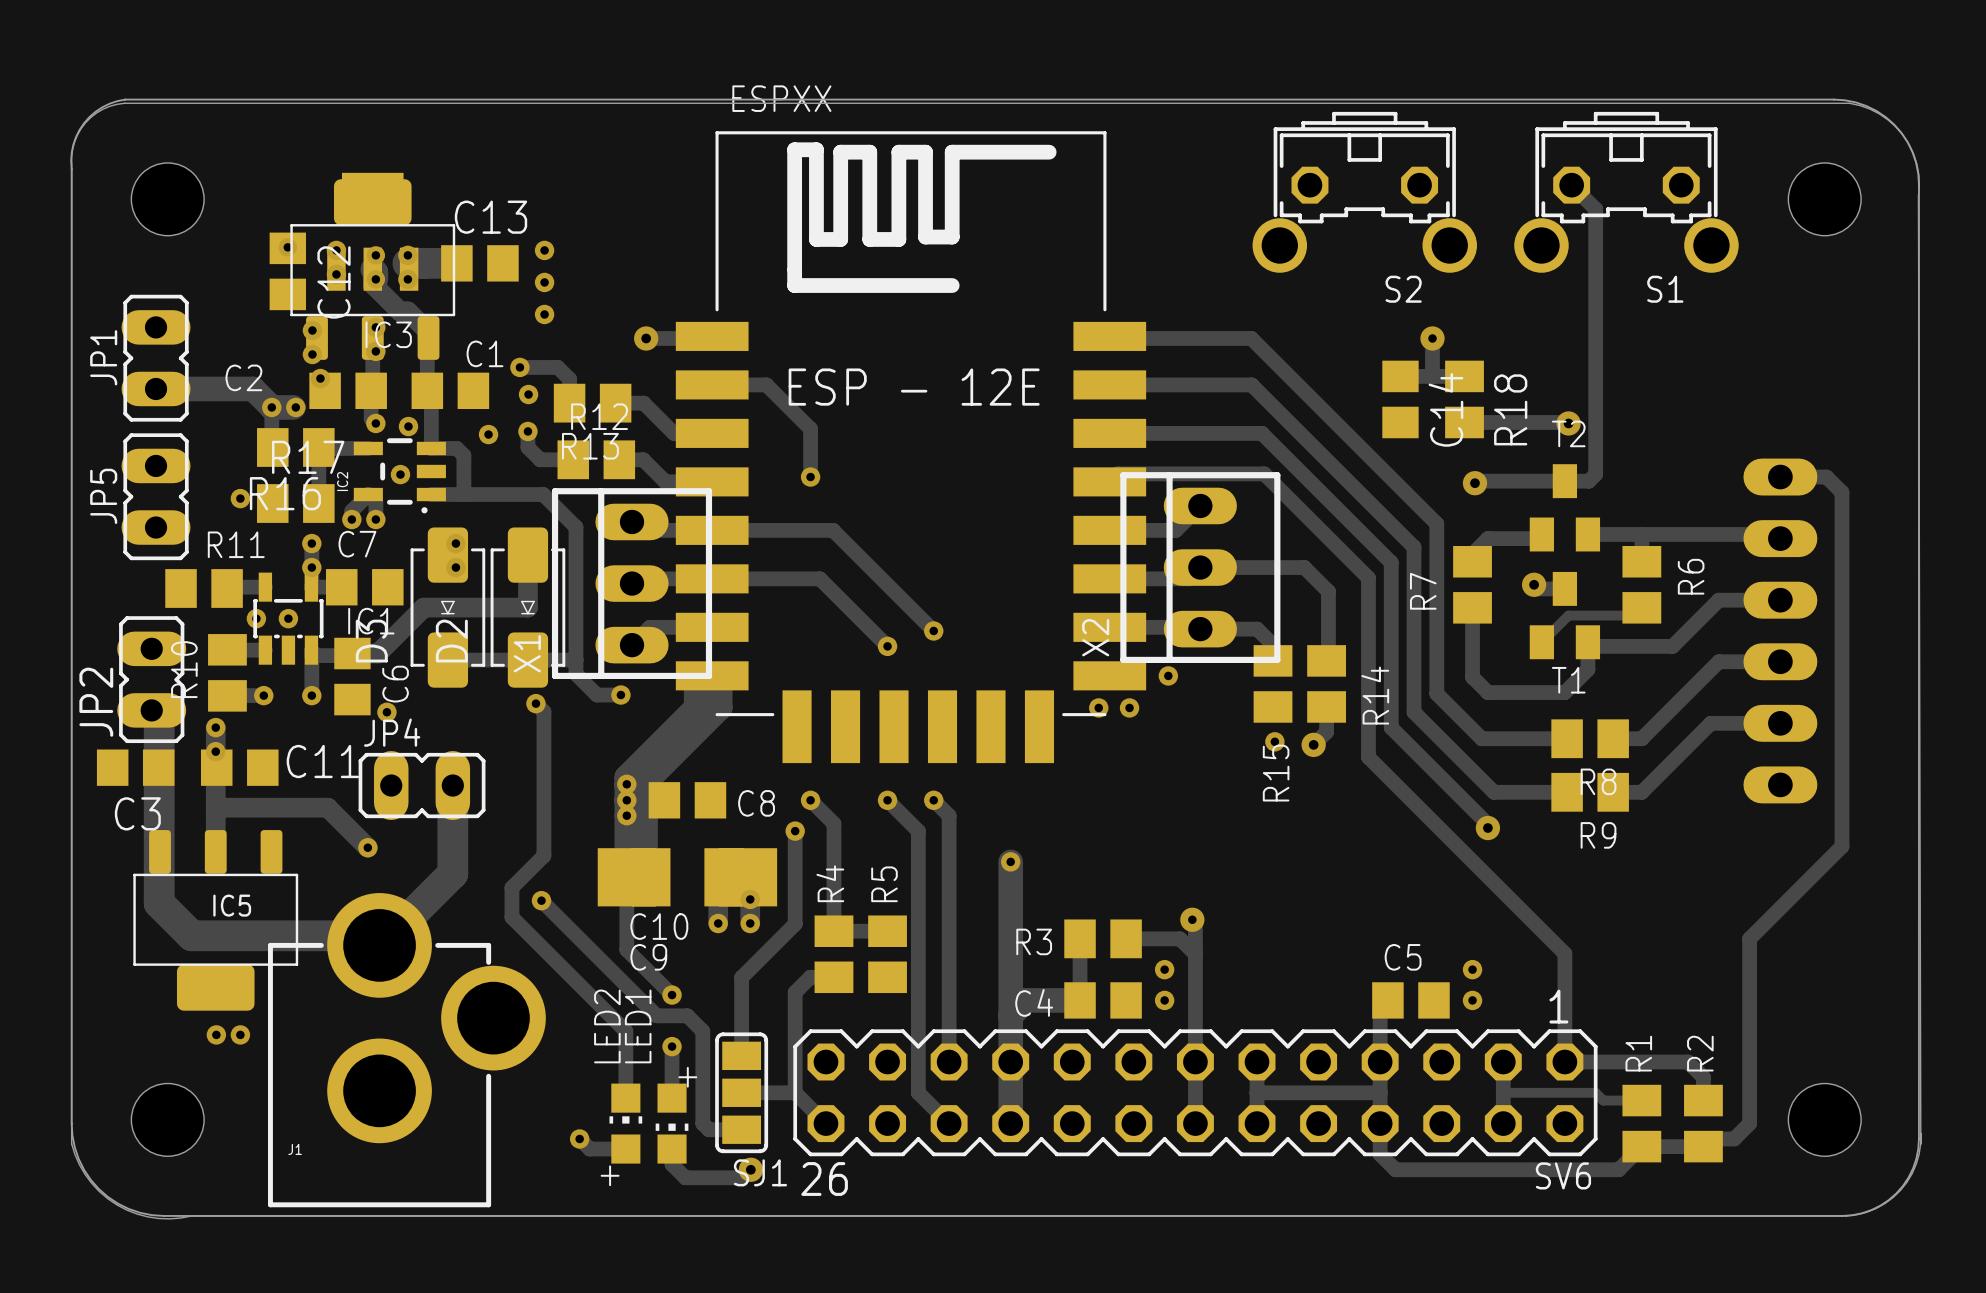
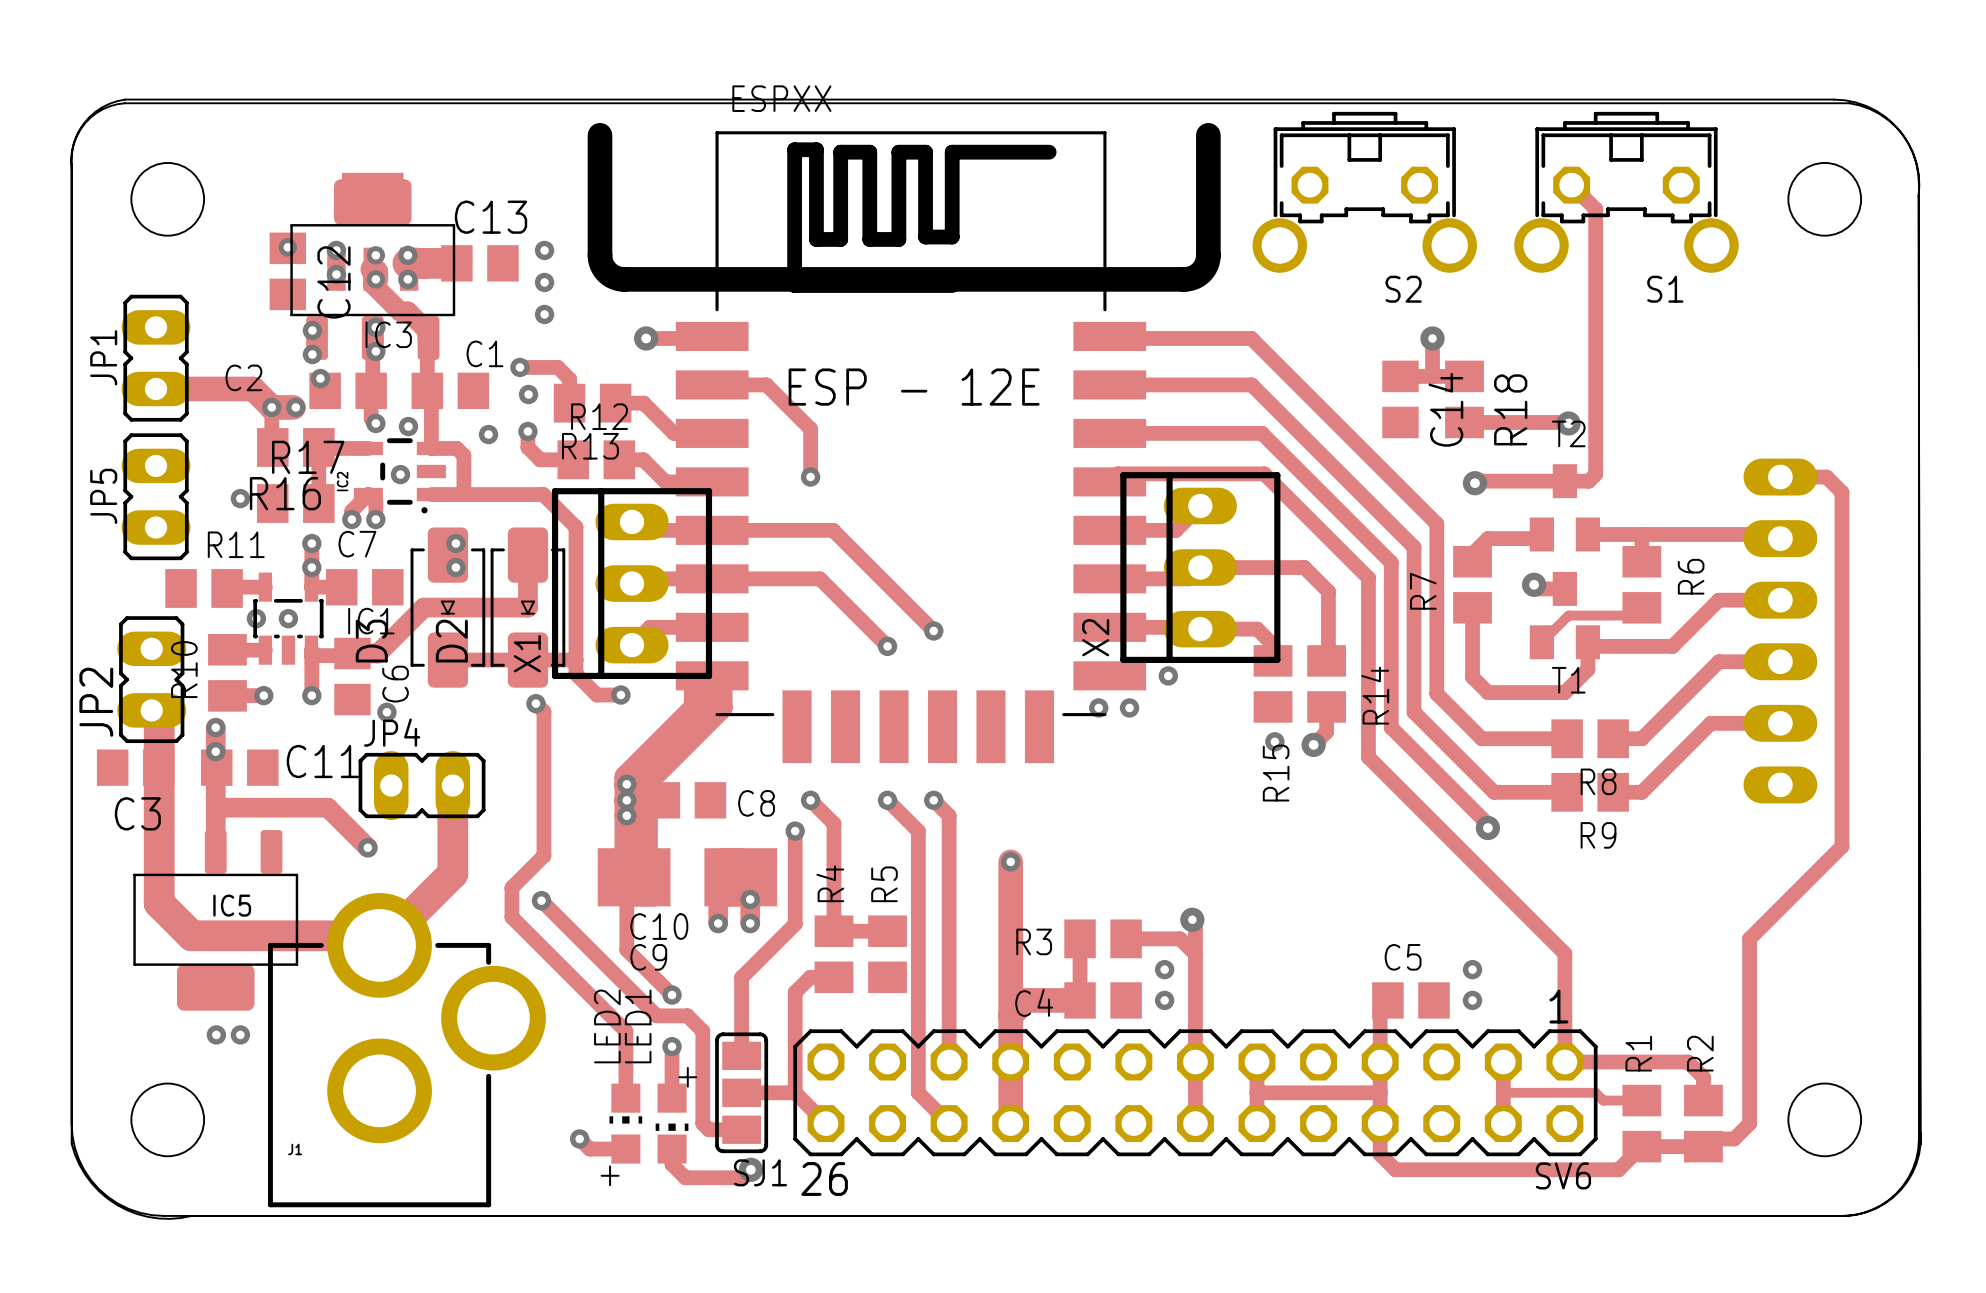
board edge: none -> (599, 135) (600, 258) (607, 272) (614, 277) (624, 279) (1190, 278) (1201, 272) (1208, 258) (1208, 135)

